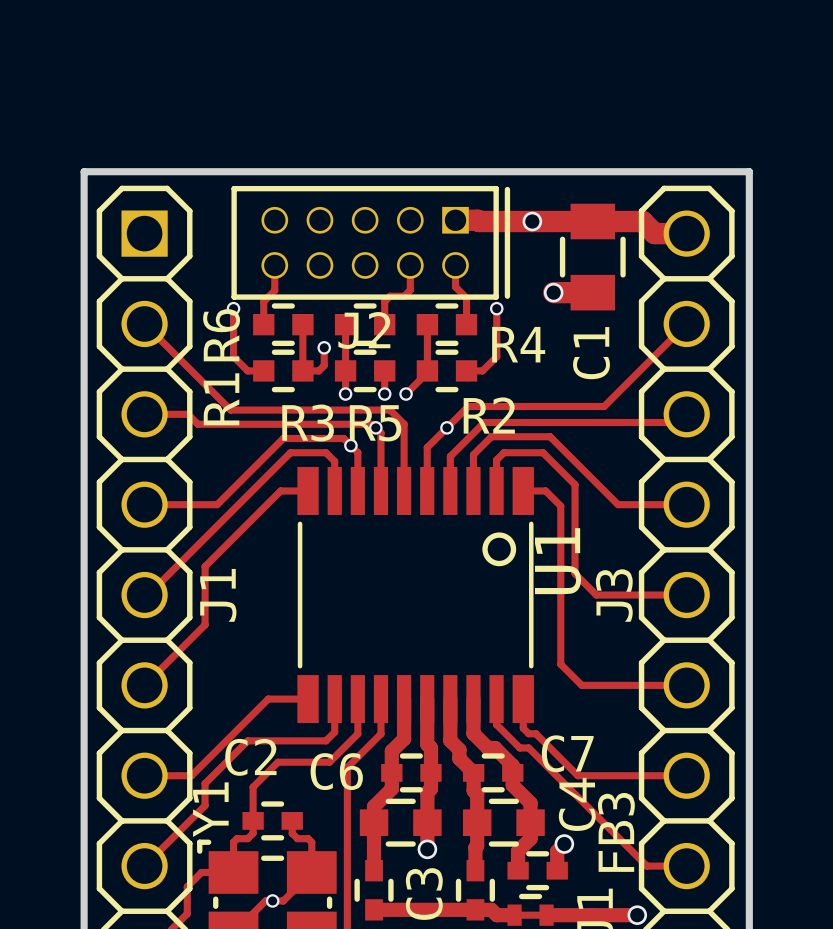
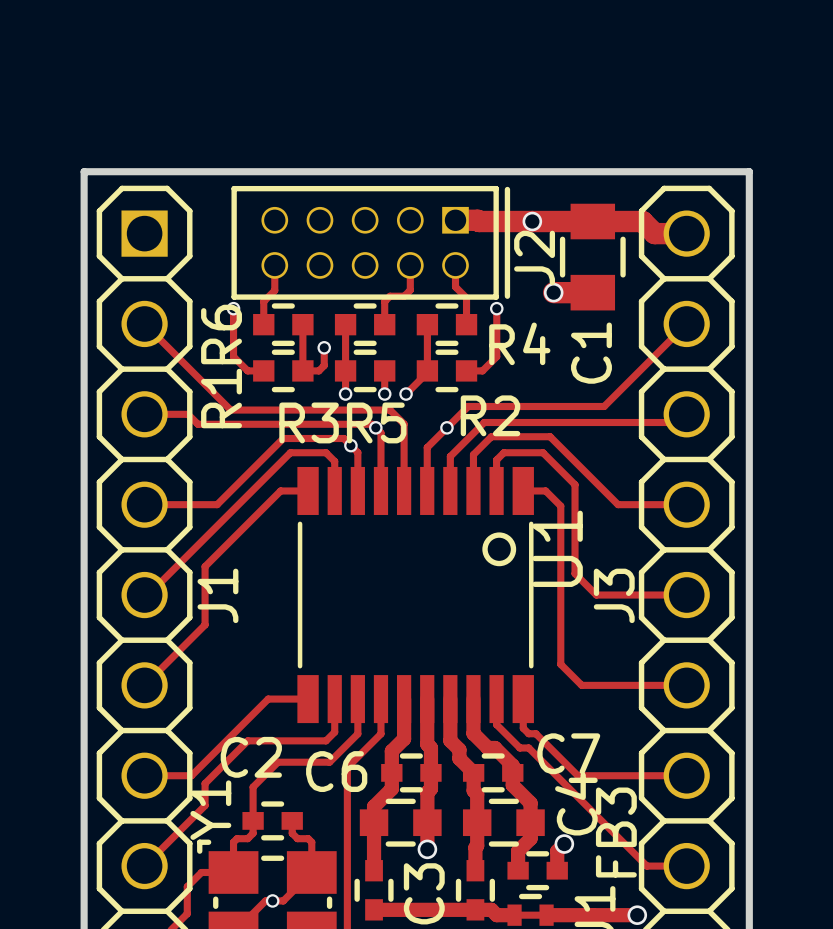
J2 name rotation: 0° (364, 330) -> 90° counterclockwise (534, 257)
J2 name position: J2 (364, 330) -> J2 (534, 257)

